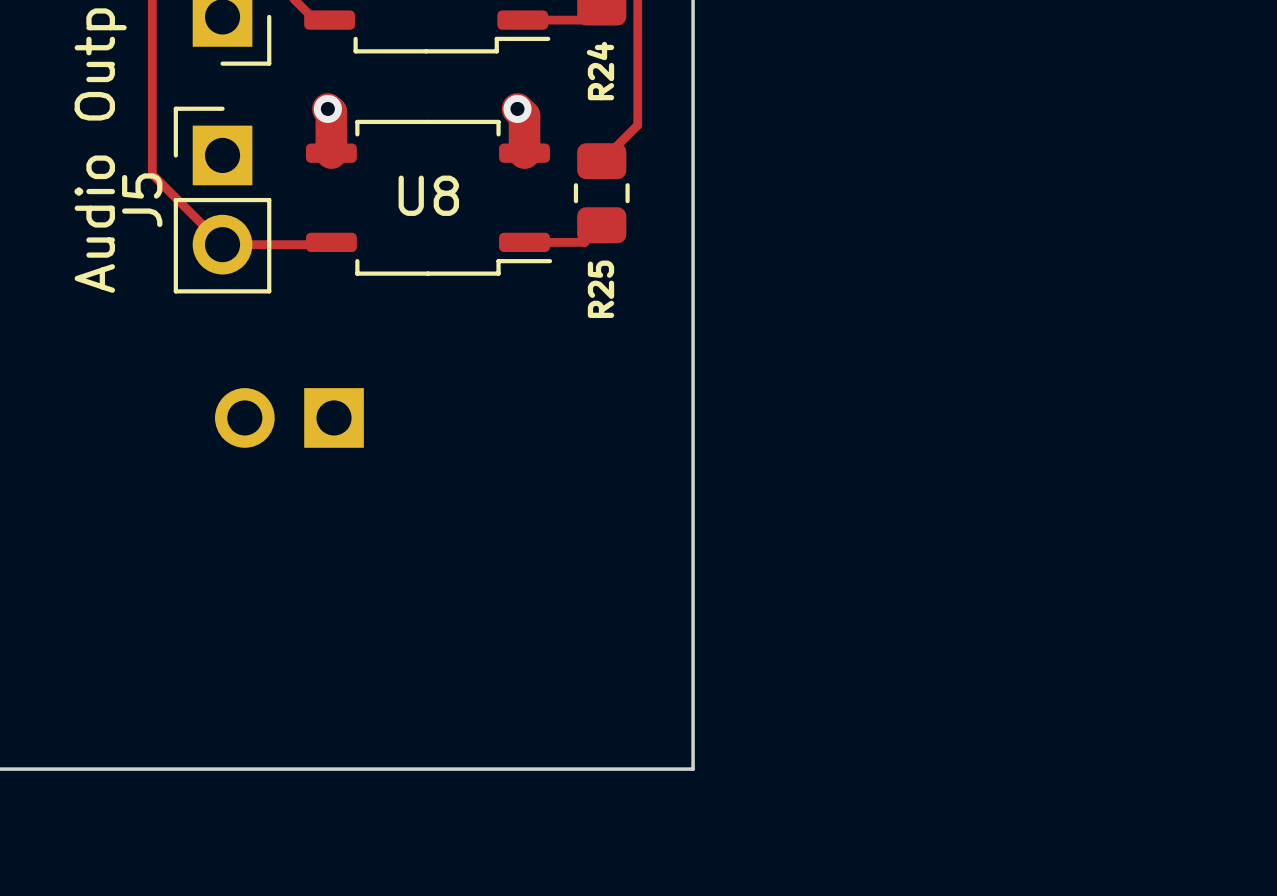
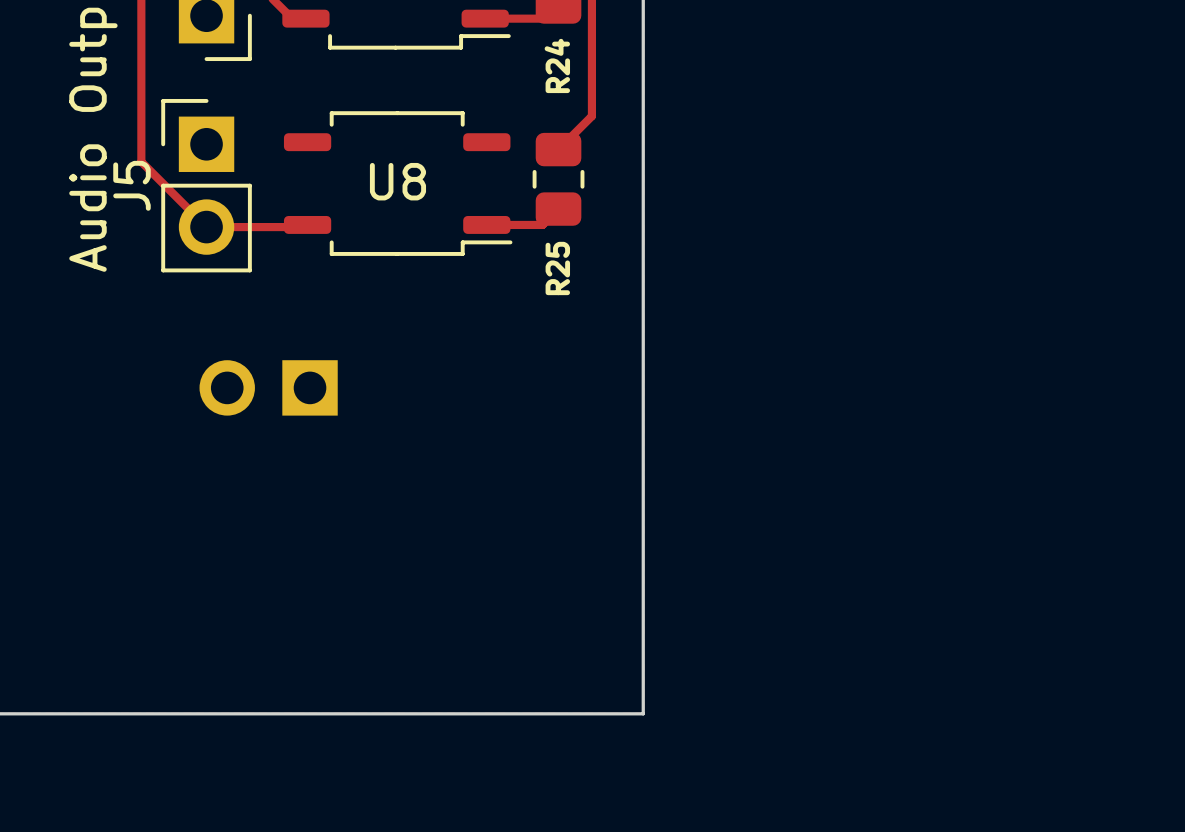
track: (327, 108) (331, 112) (331, 153) -> none
via: (327, 108) -> none
track: (517, 108) (524, 115) (524, 153) -> none
via: (517, 108) -> none

